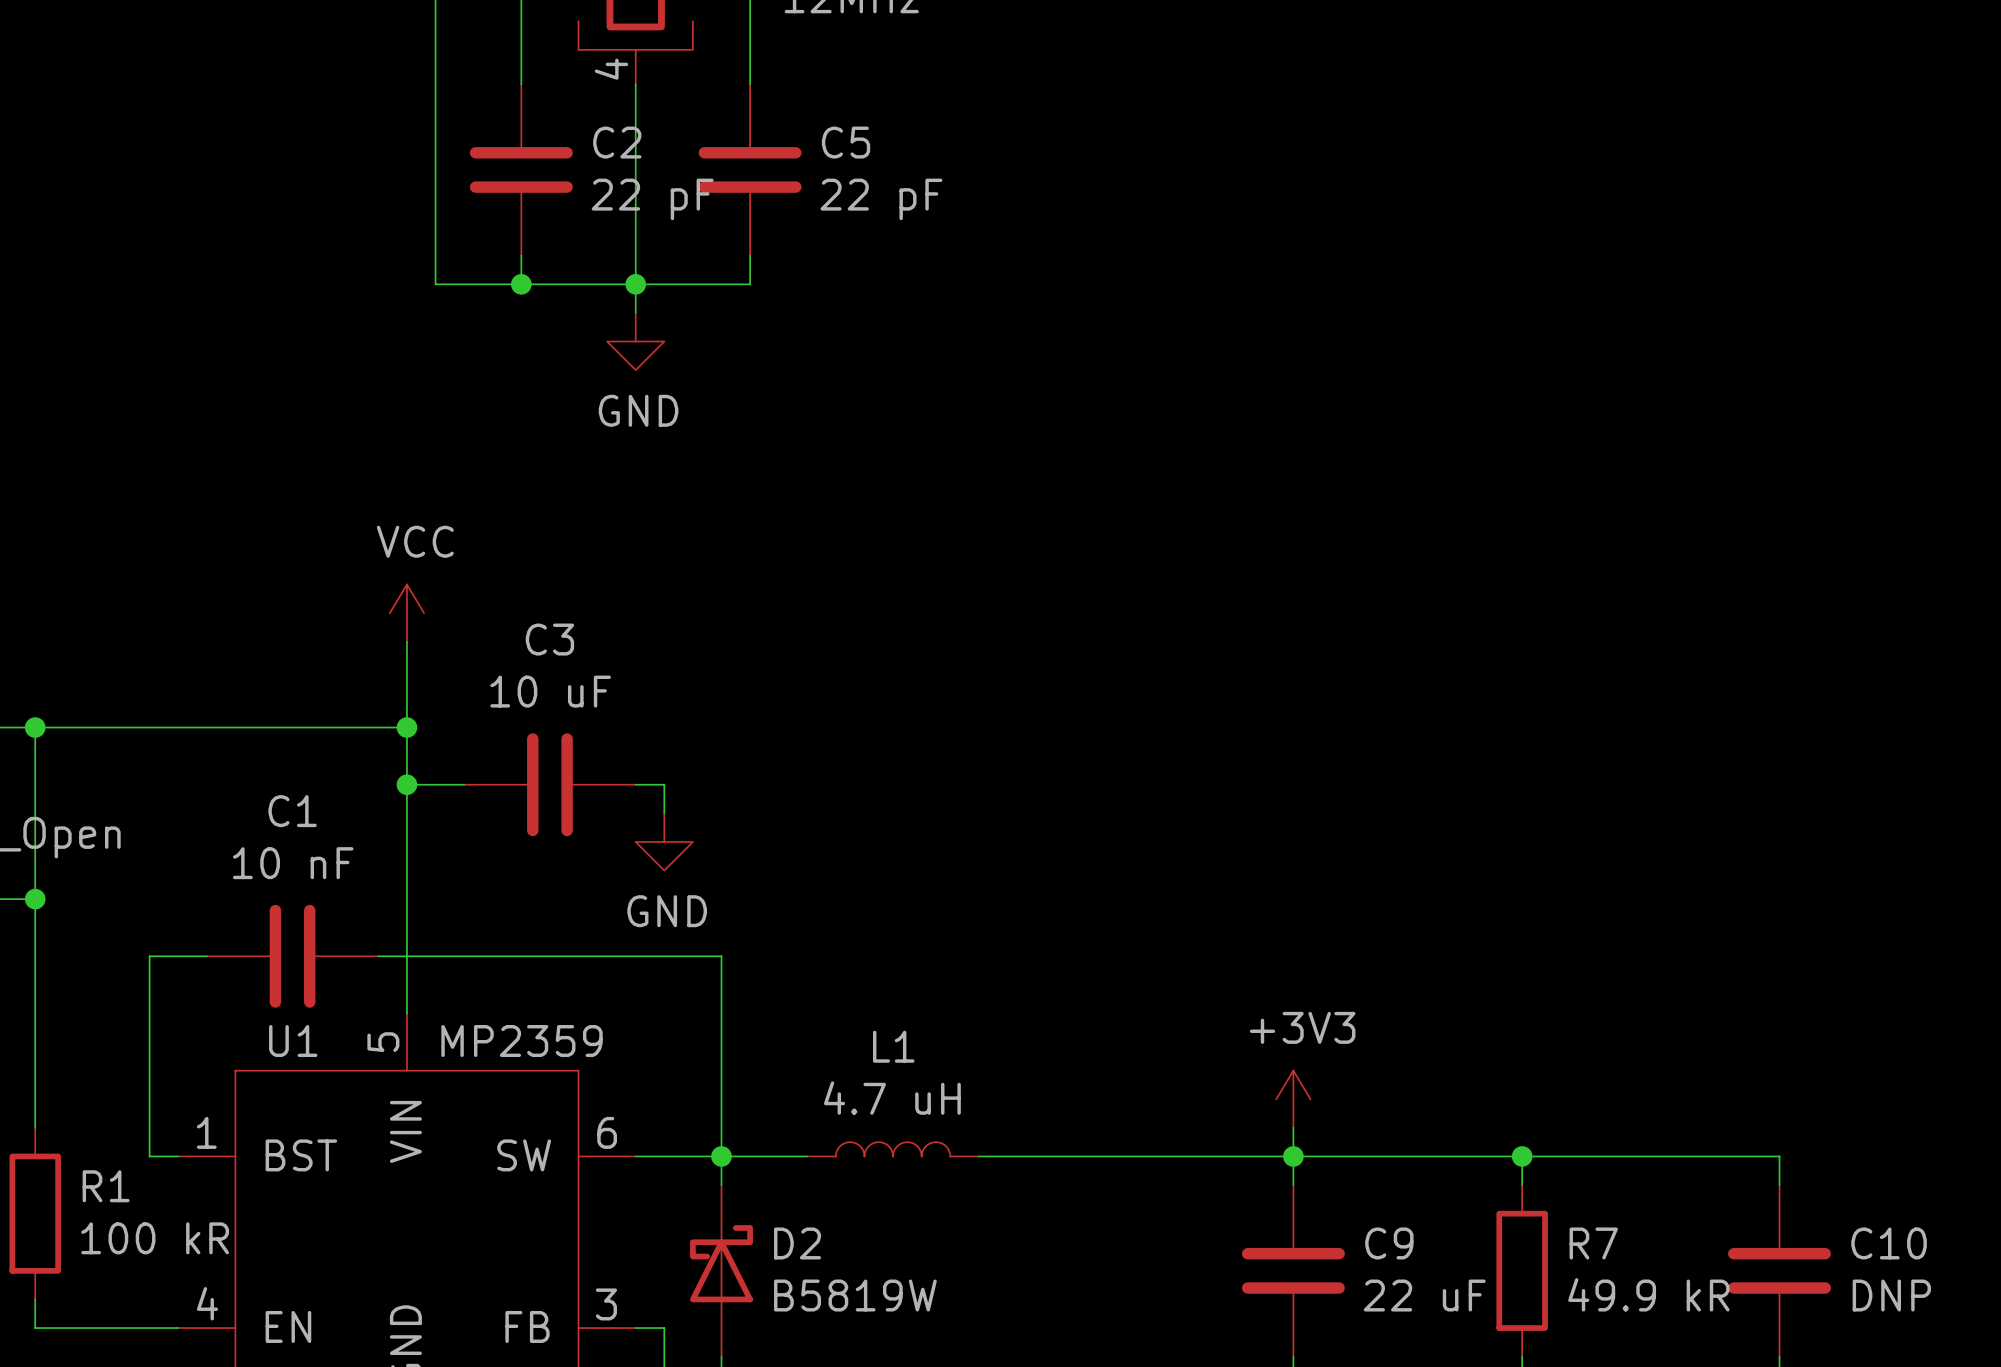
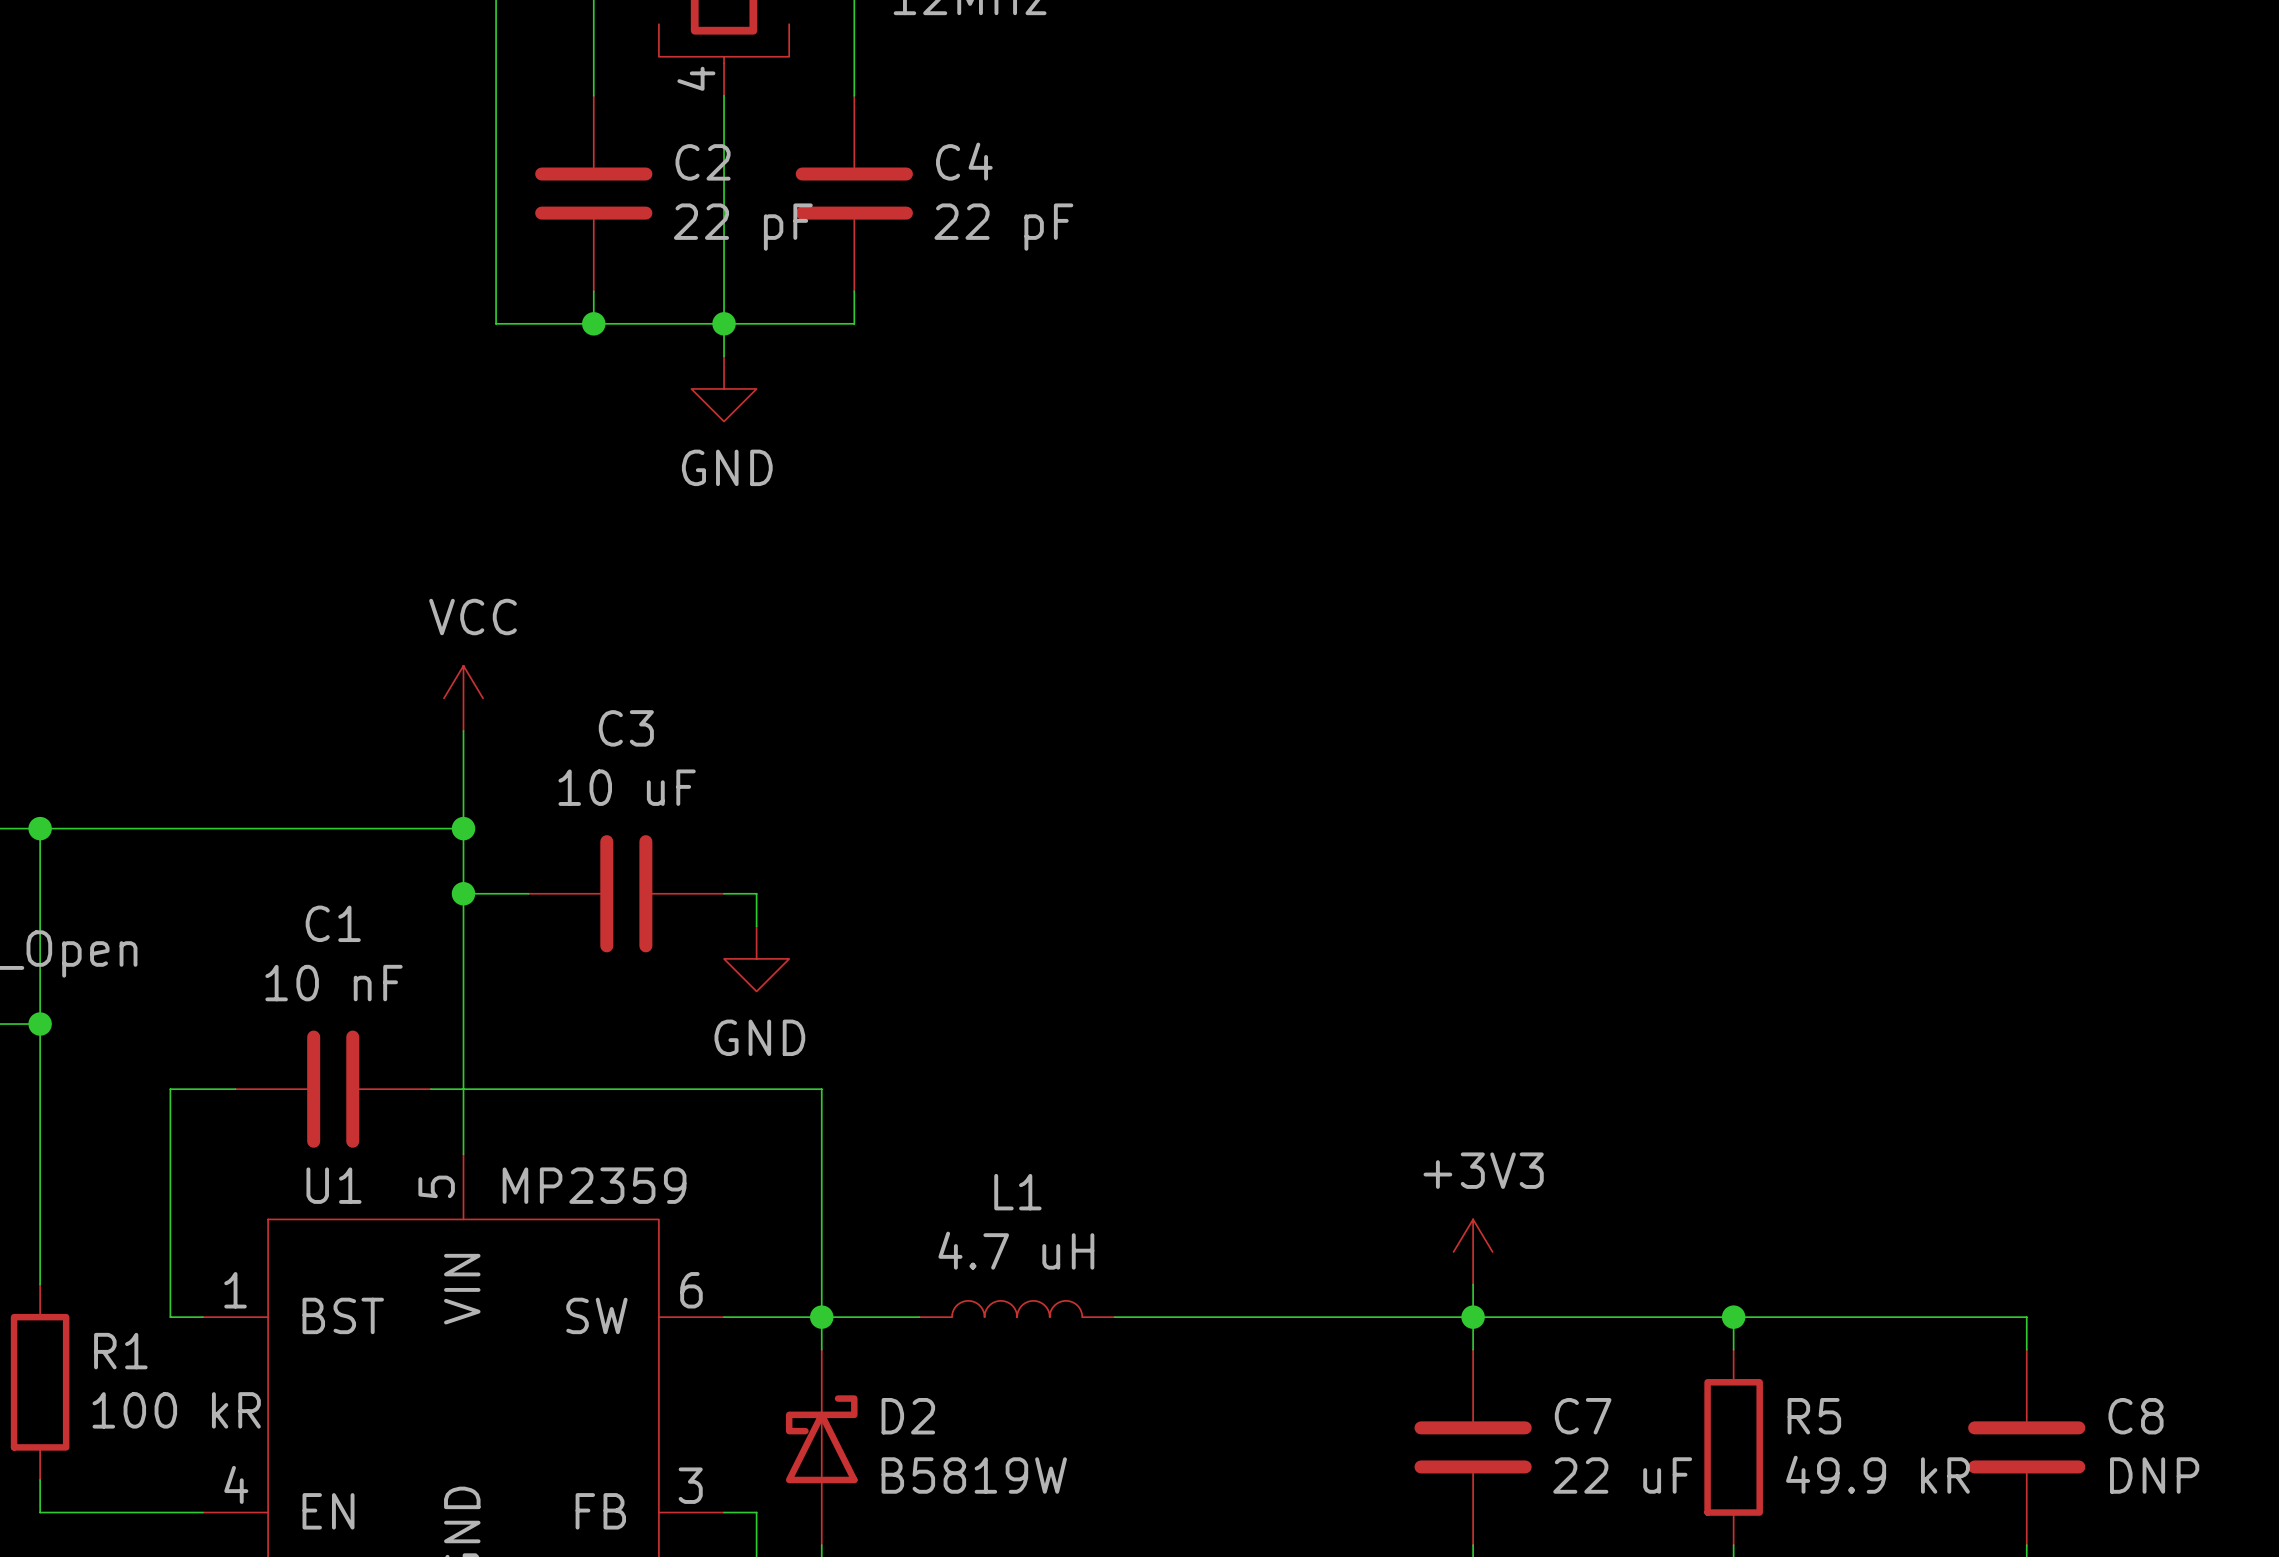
C5 name: C5 (846, 142) -> C4 (964, 161)
C9 name: C9 (1389, 1243) -> C7 (1583, 1416)
R7 name: R7 (1593, 1243) -> R5 (1814, 1416)
C10 name: C10 (1889, 1243) -> C8 (2136, 1416)

